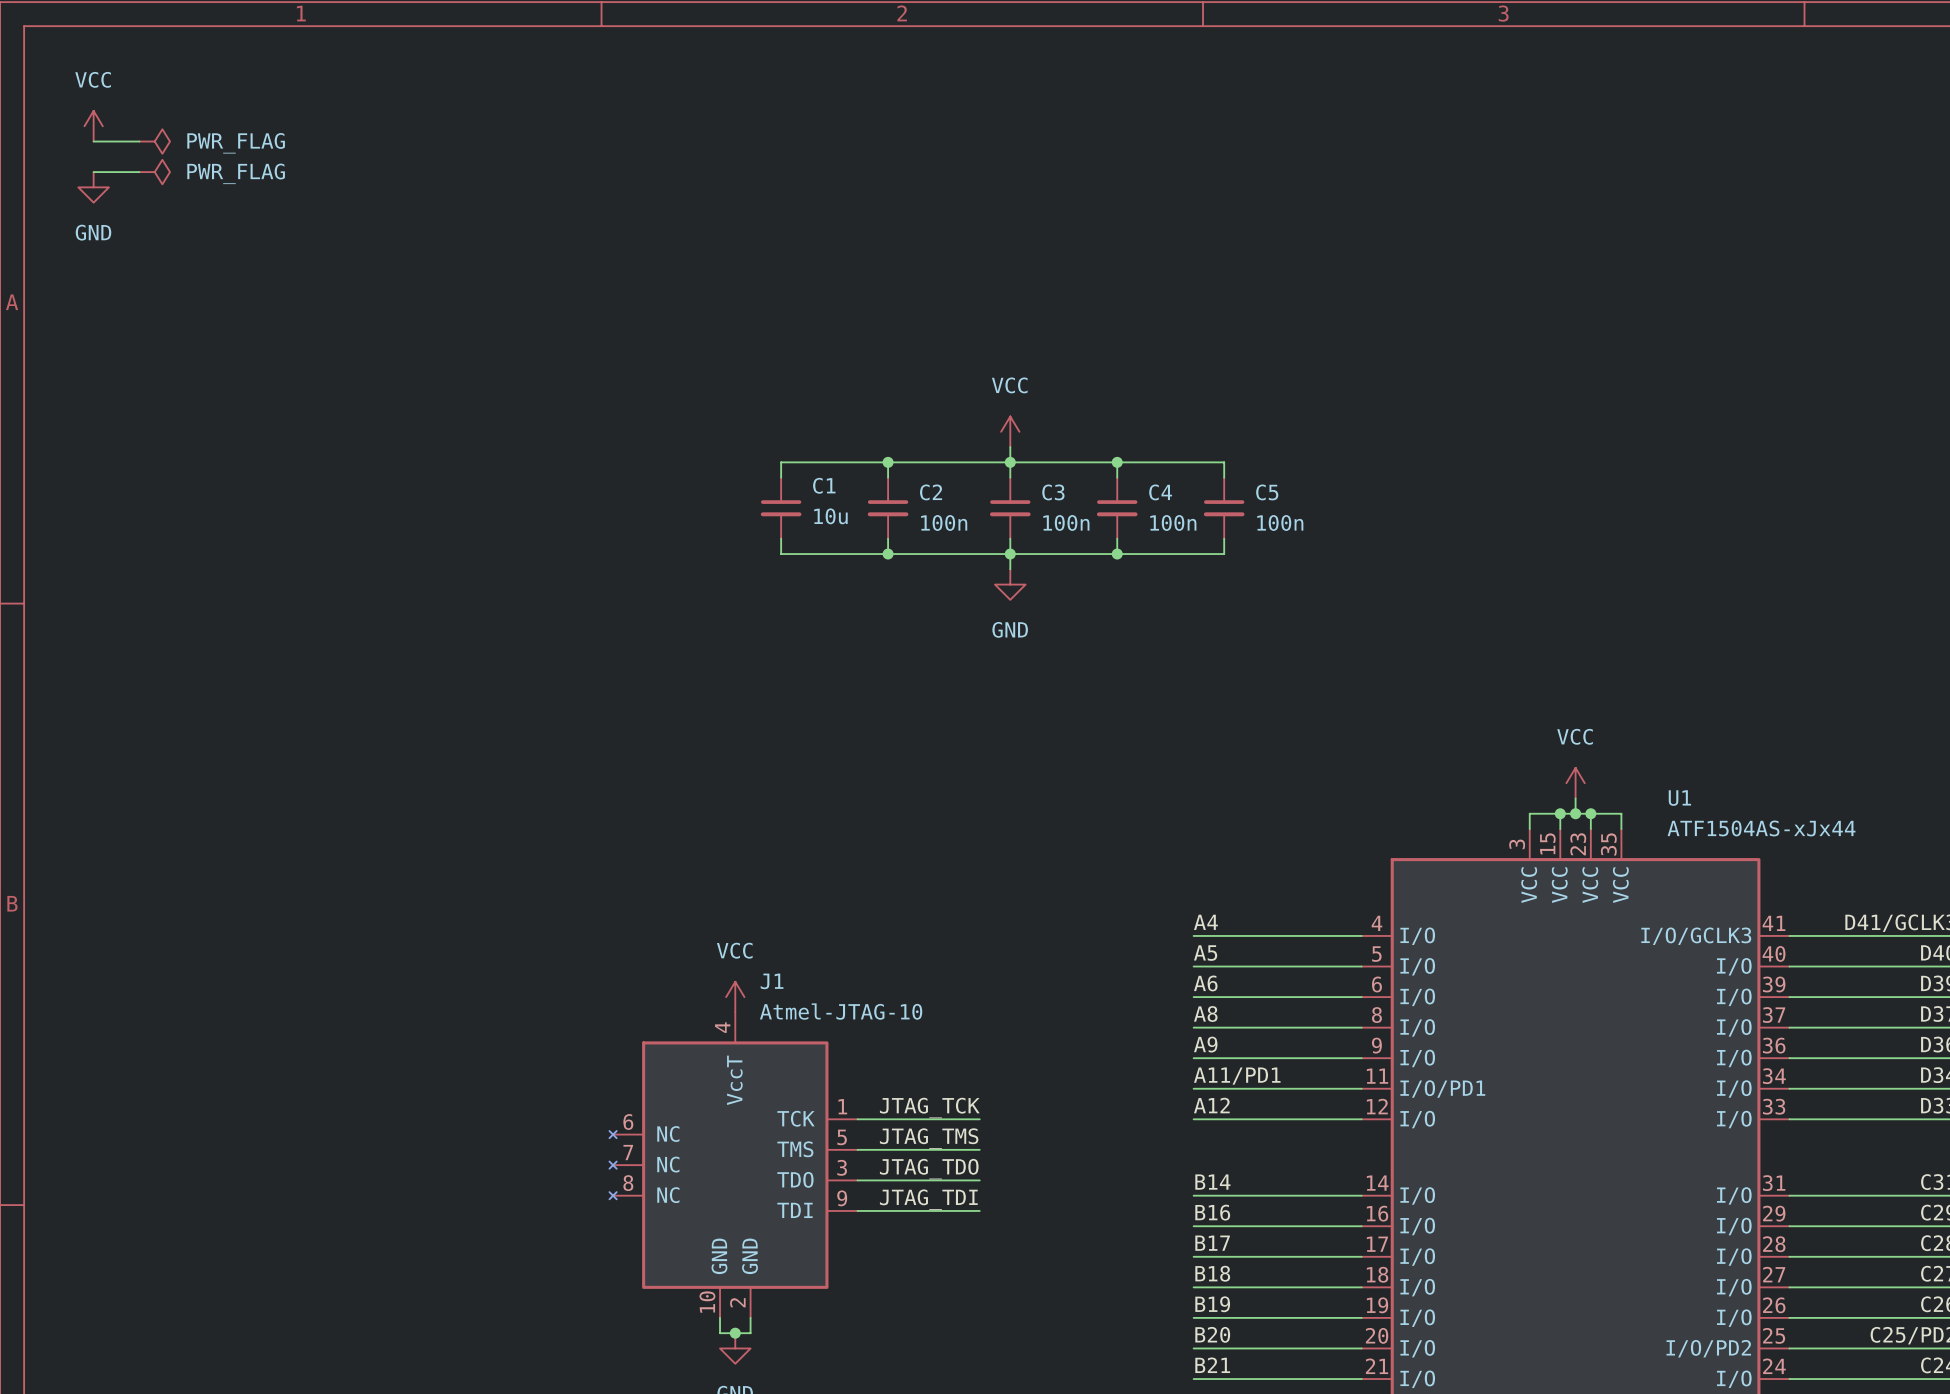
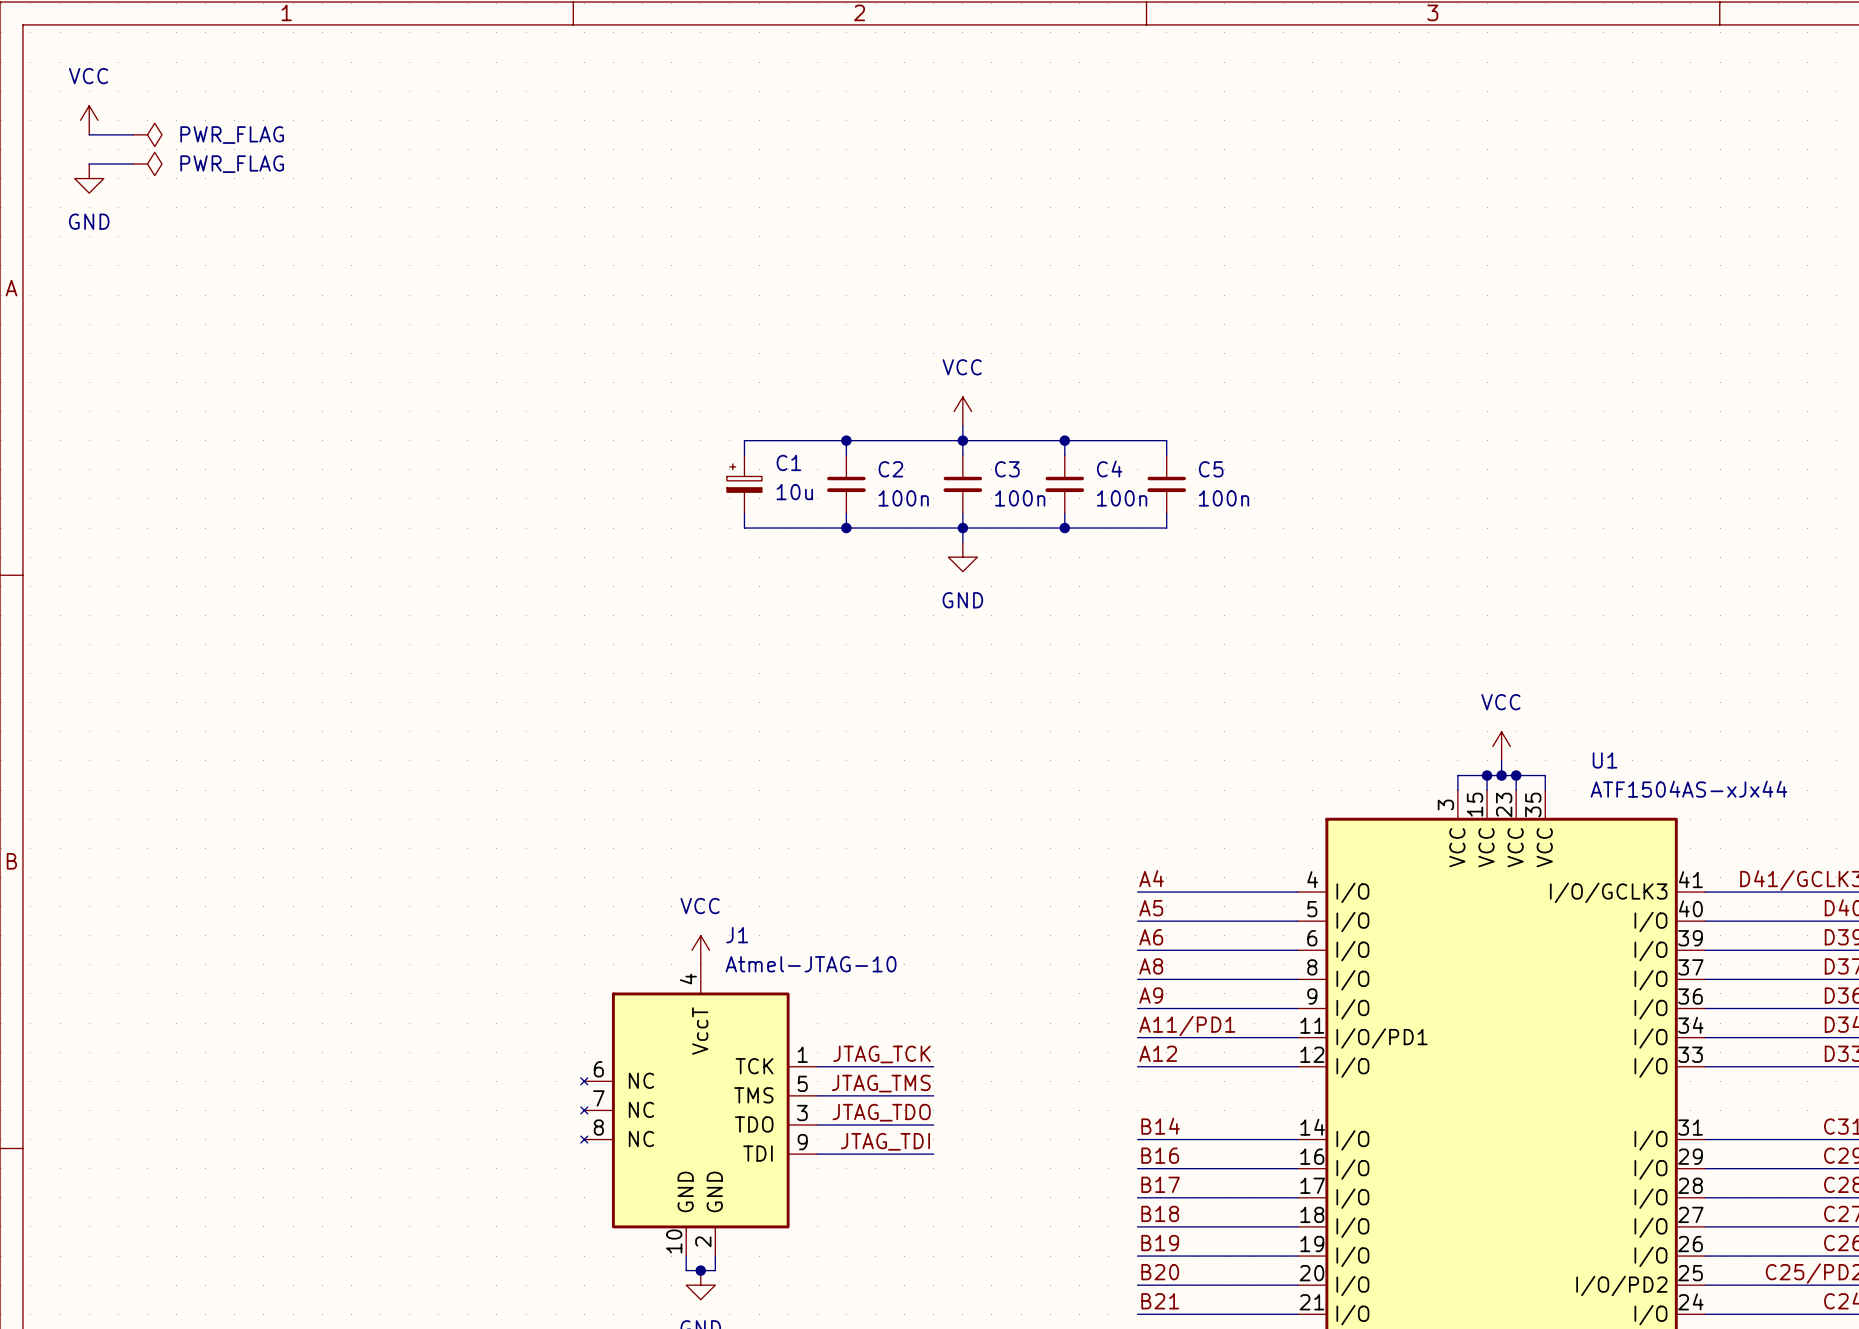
C1 symbol: [760, 477, 802, 539] -> [726, 455, 762, 514]

